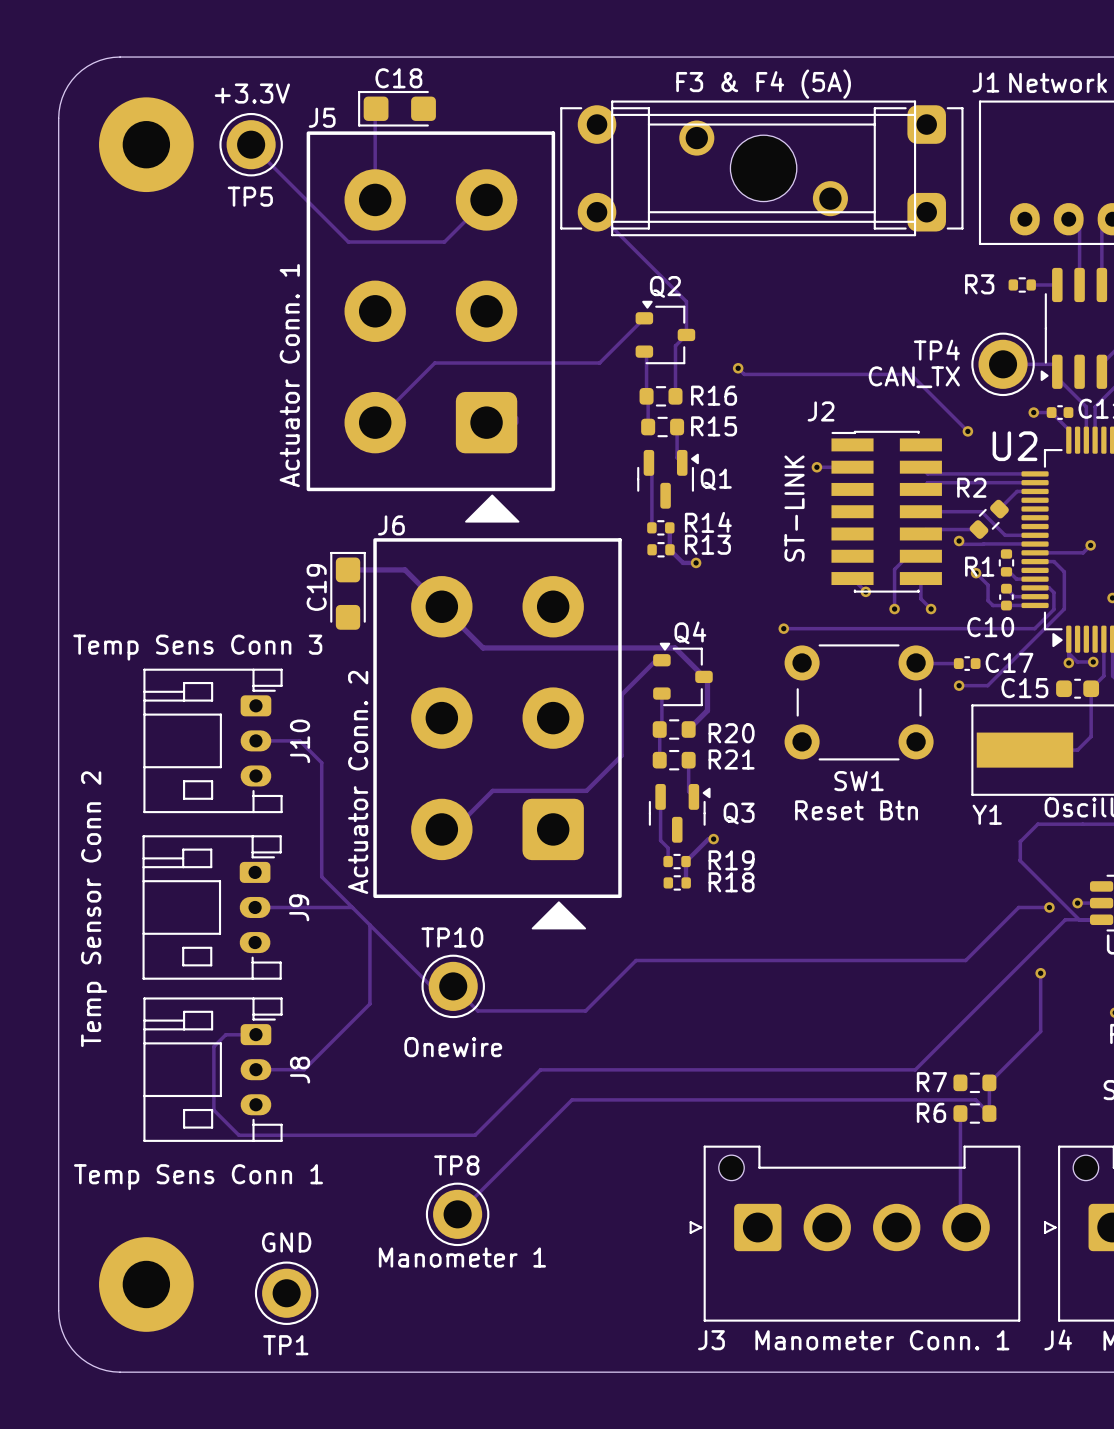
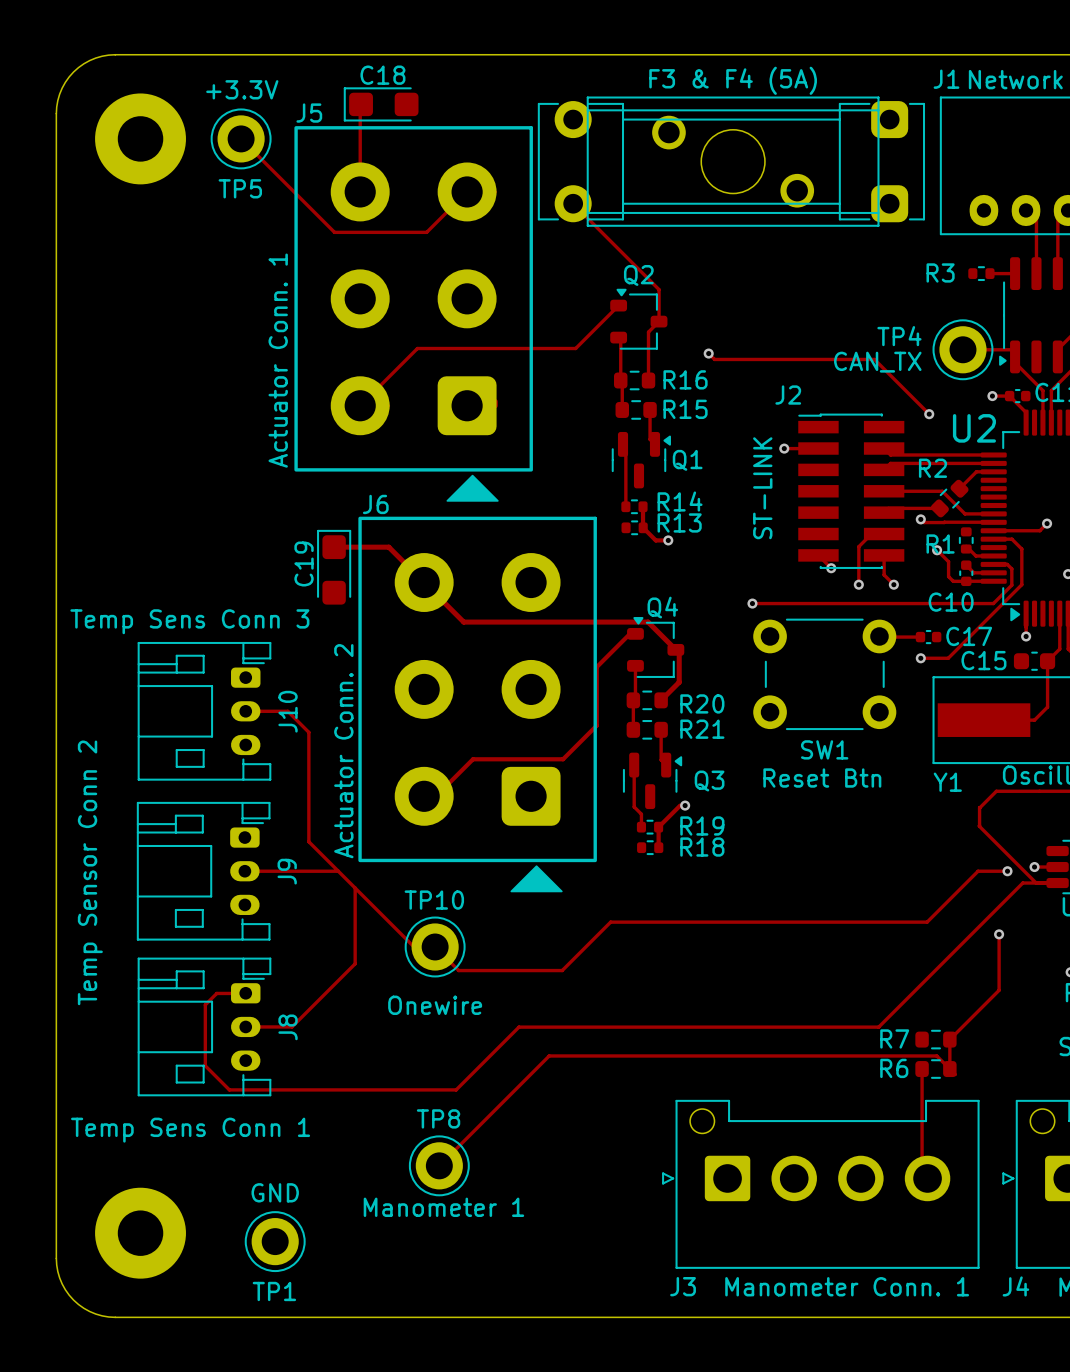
track: (1068, 653) (1077, 661) (1093, 661) -> none
via: (1093, 661) -> none

